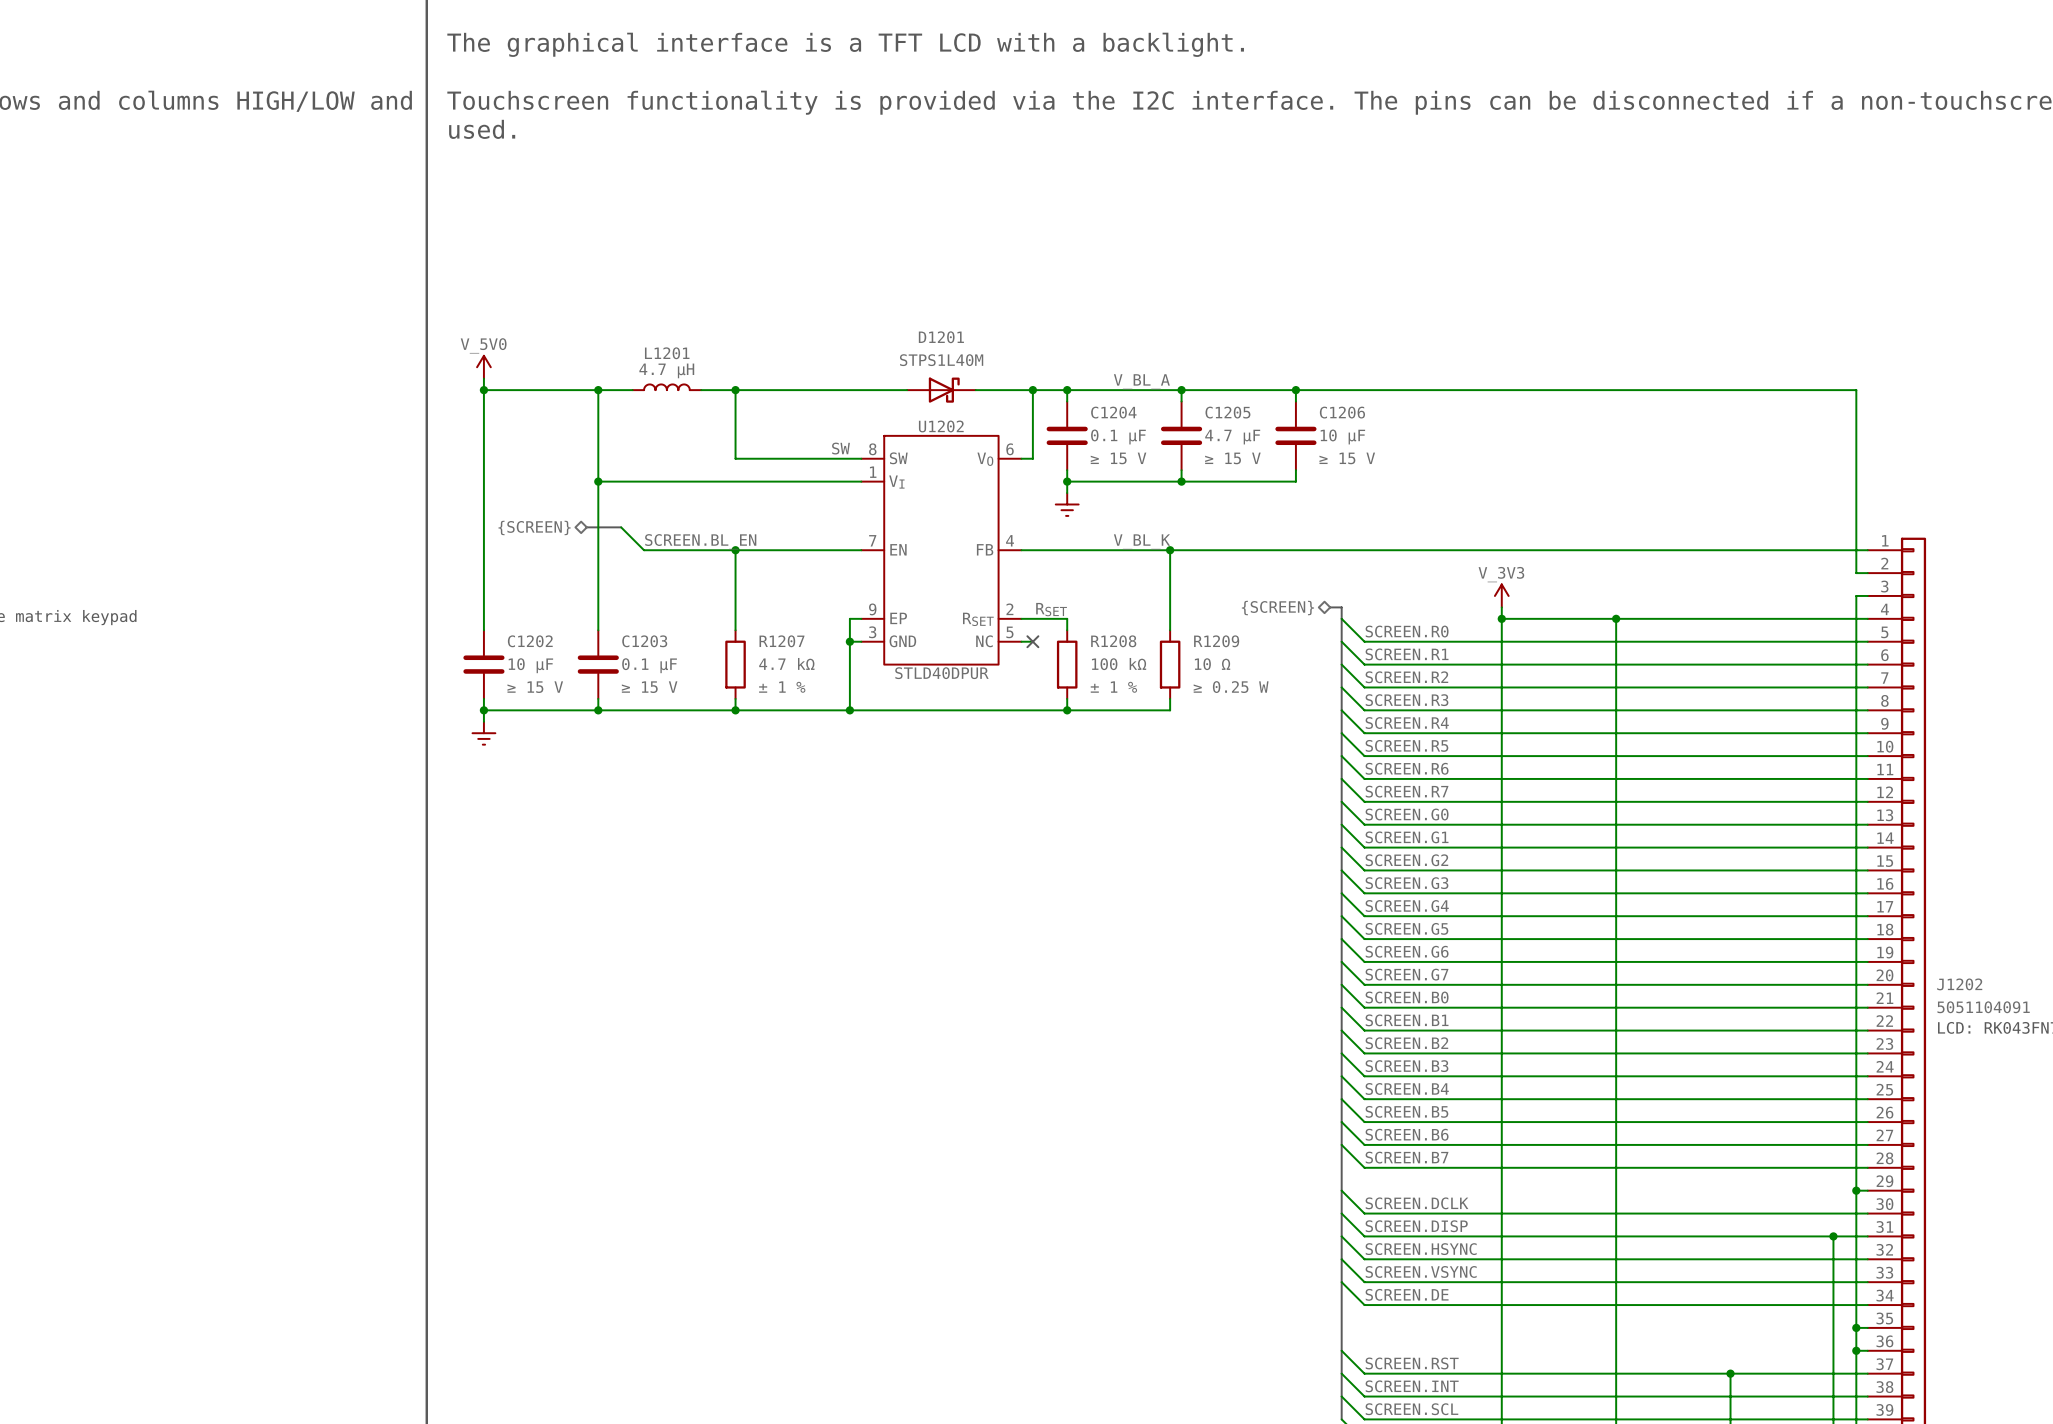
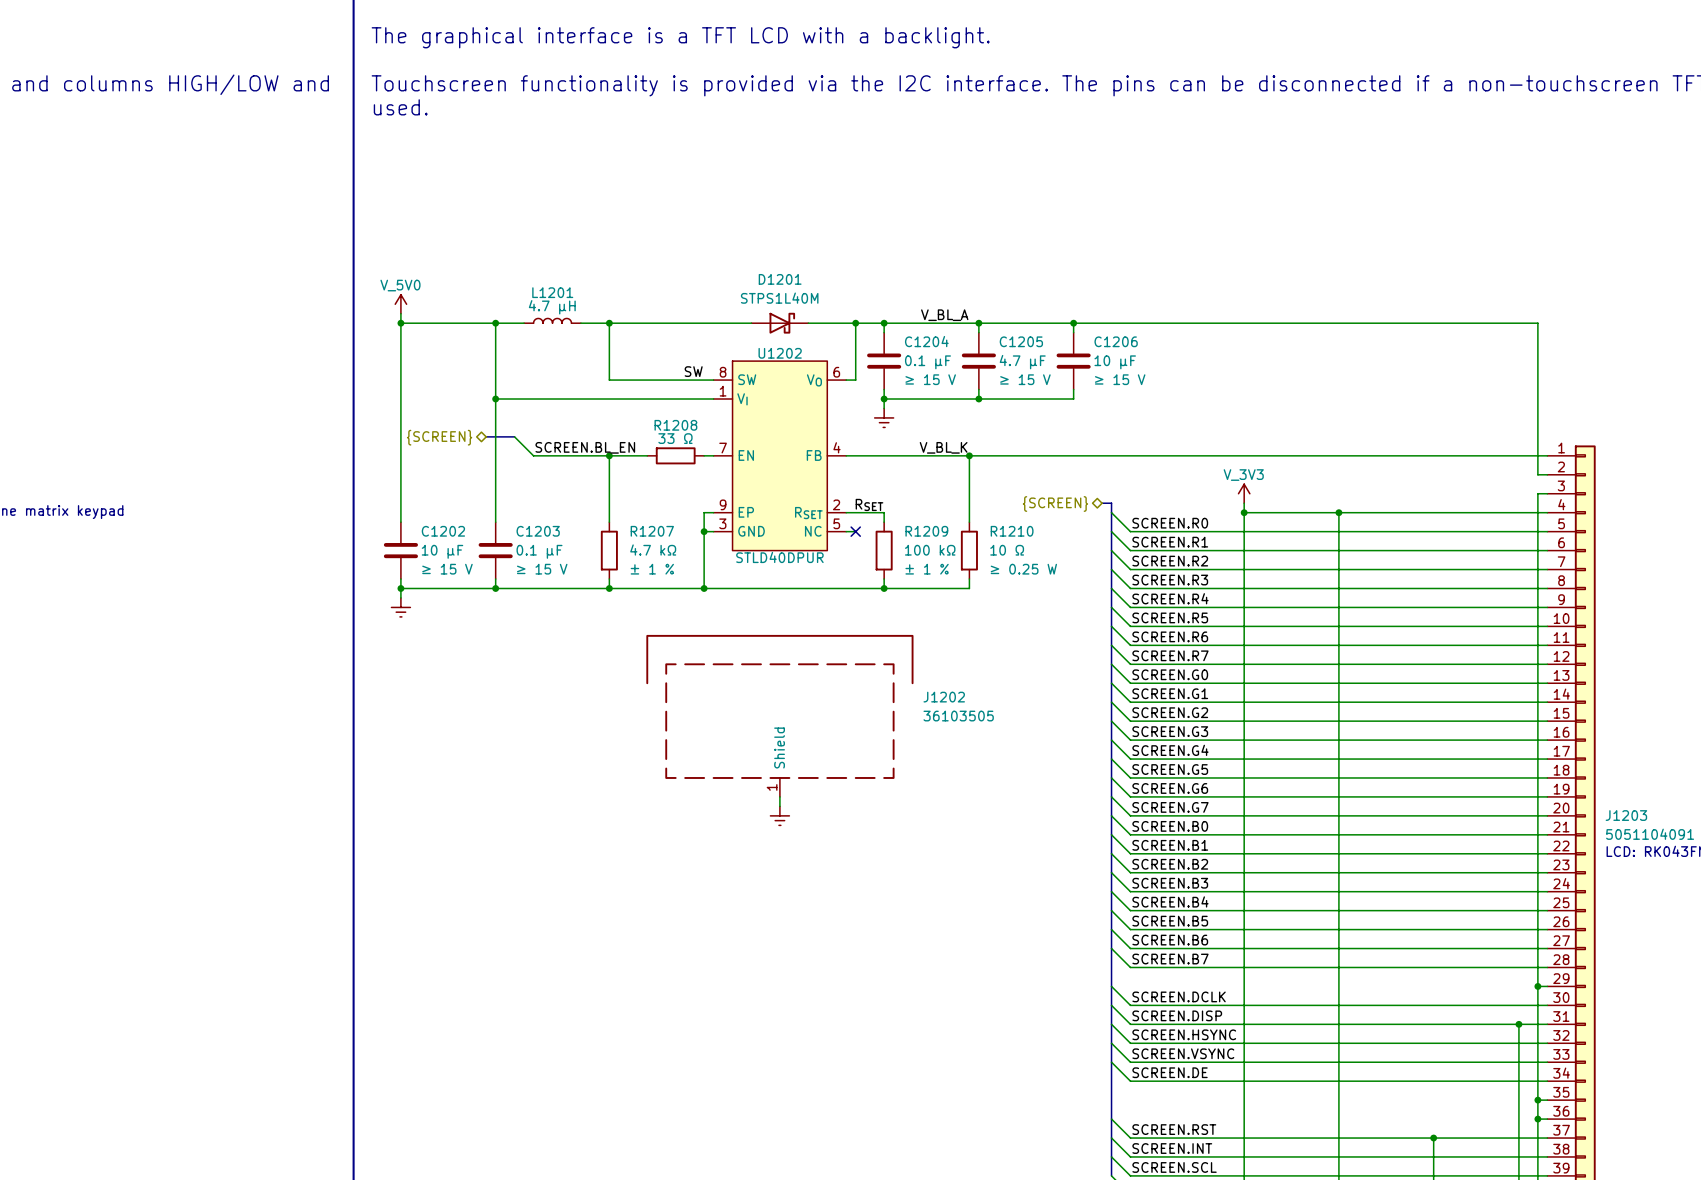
wire: (781, 550) (849, 550) -> none
R1208: none -> 33 Ω (675, 455)
R1208 name: R1208 (1113, 641) -> R1209 (926, 531)
R1209 name: R1209 (1216, 641) -> R1210 (1012, 531)
J1202: none -> 36103505 (779, 715)
wire: none -> (779, 796) (779, 806)
power symbol: none -> (779, 815)
J1202 name: J1202 (1959, 984) -> J1203 (1626, 815)

